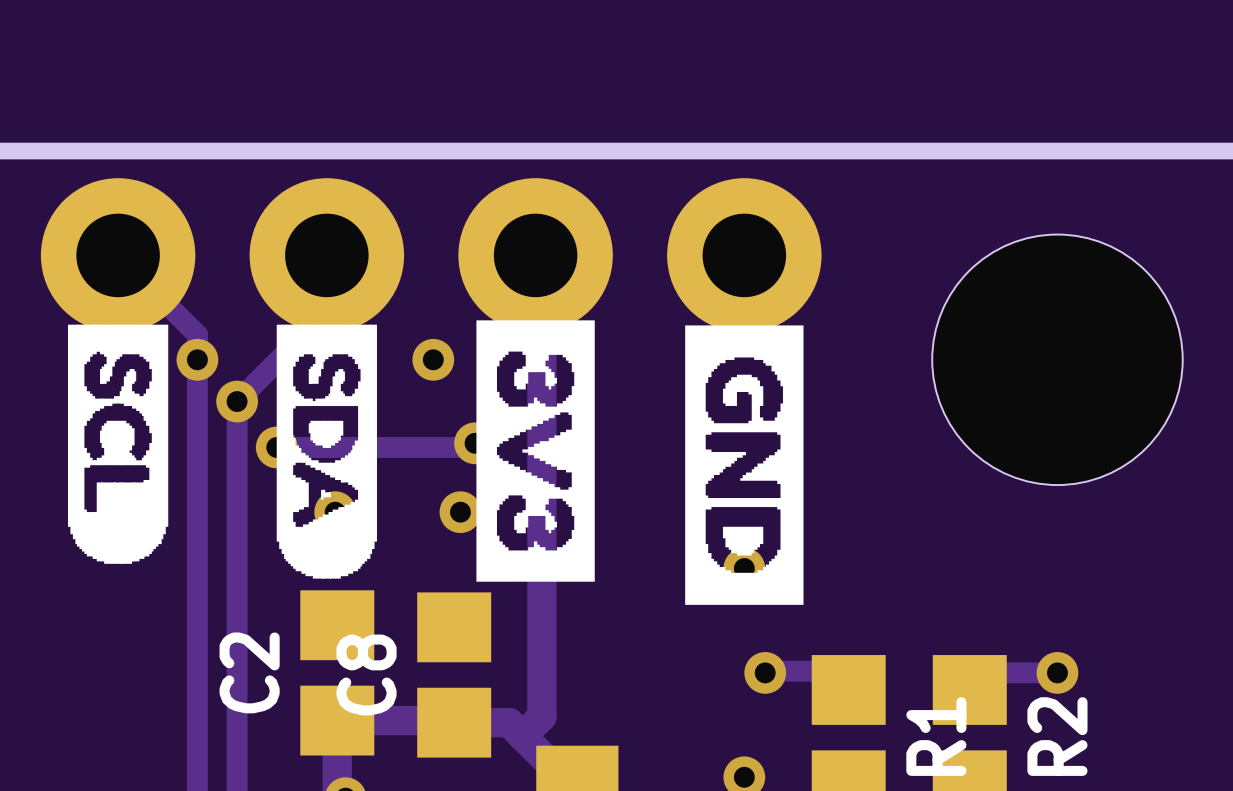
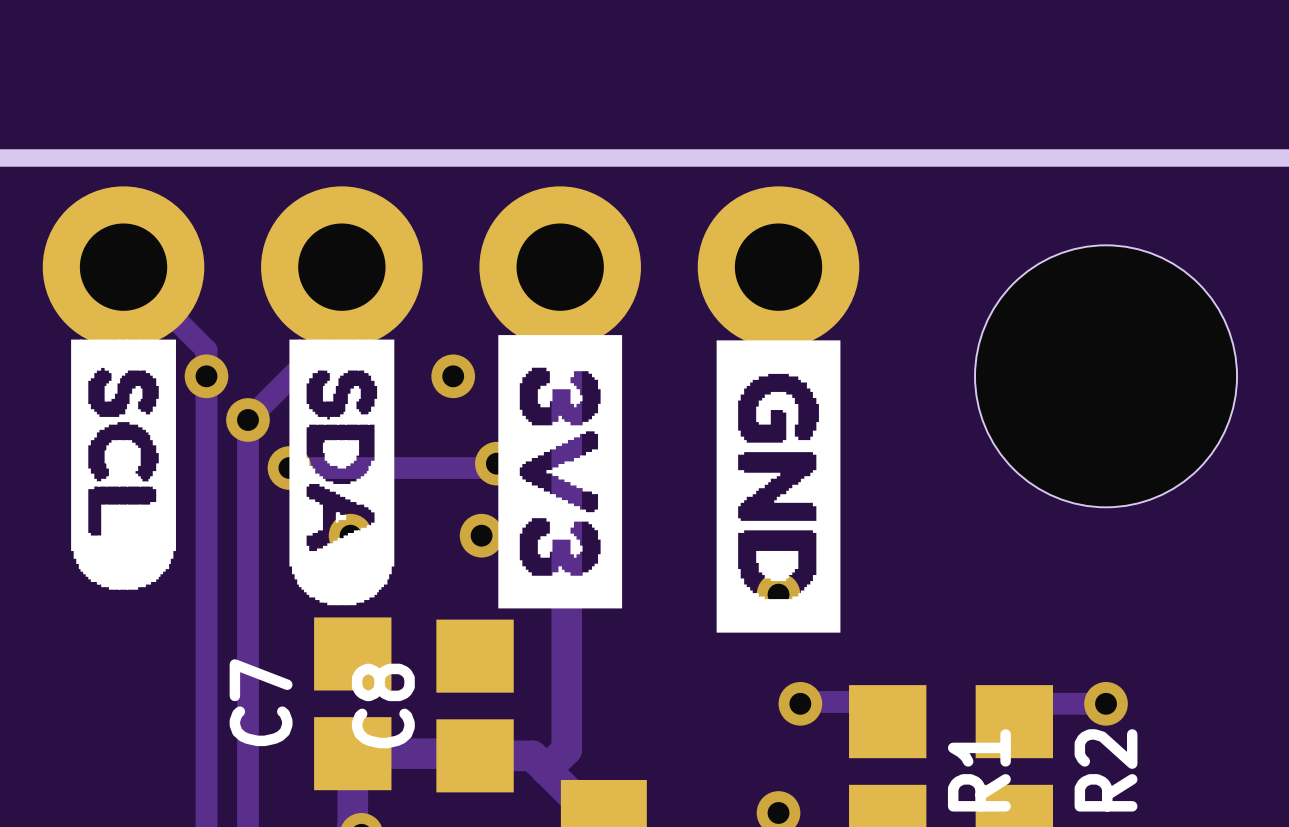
C2 name: C2 (249, 672) -> C7 (261, 702)

